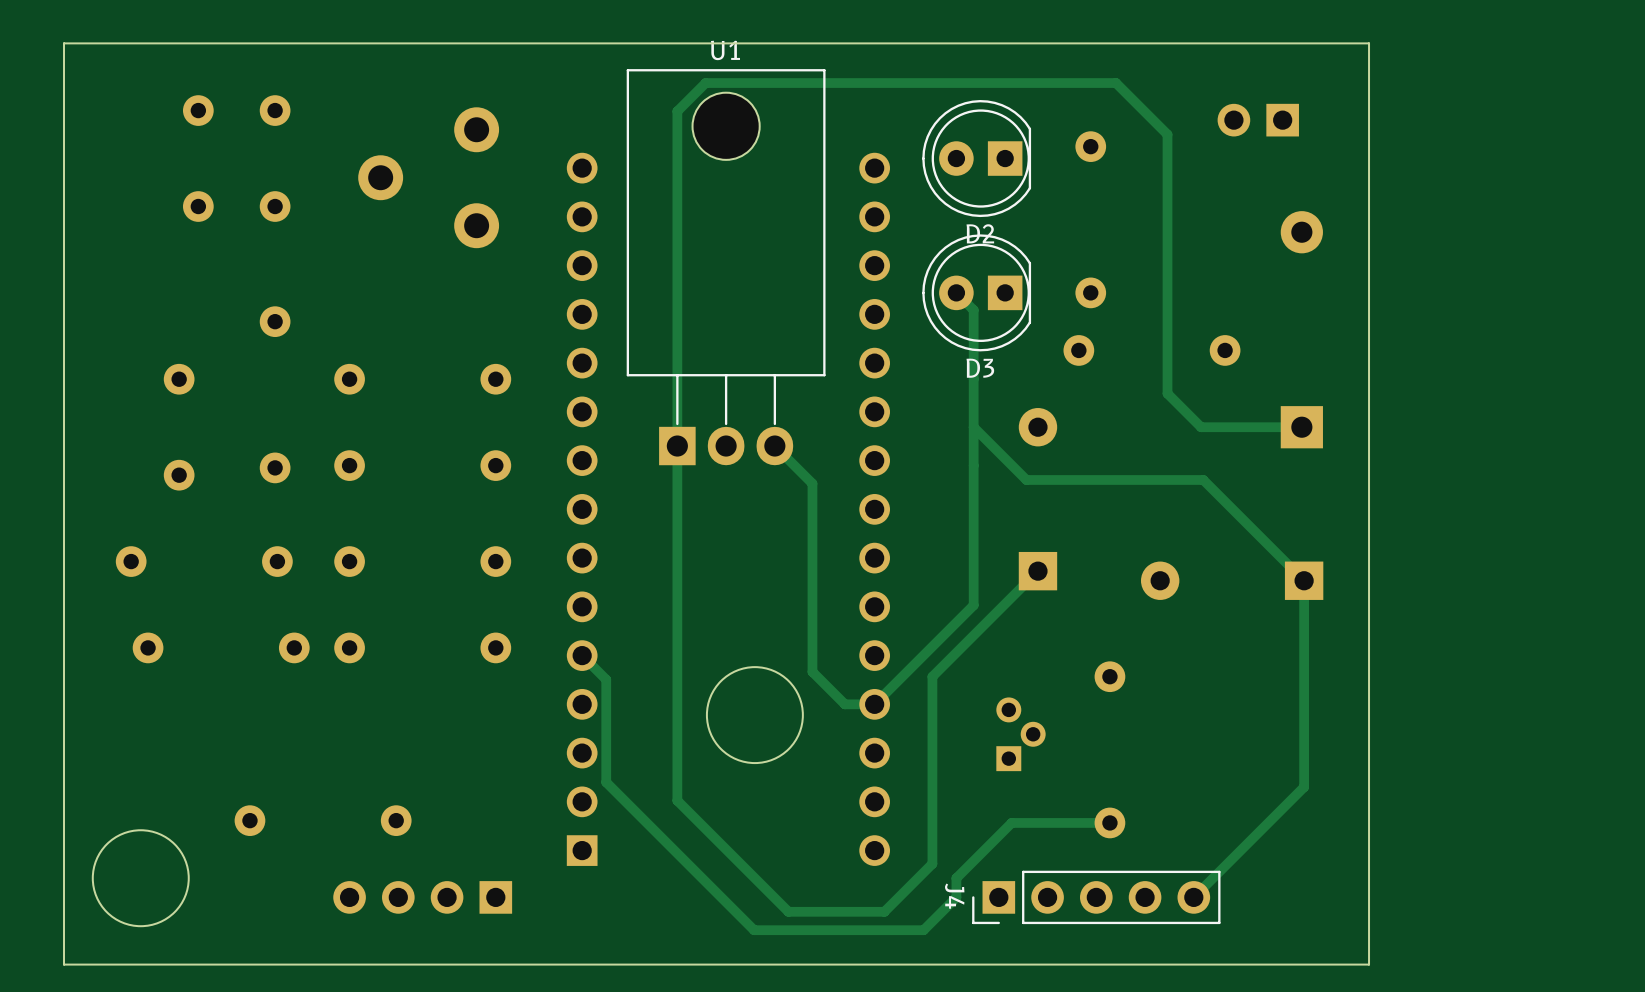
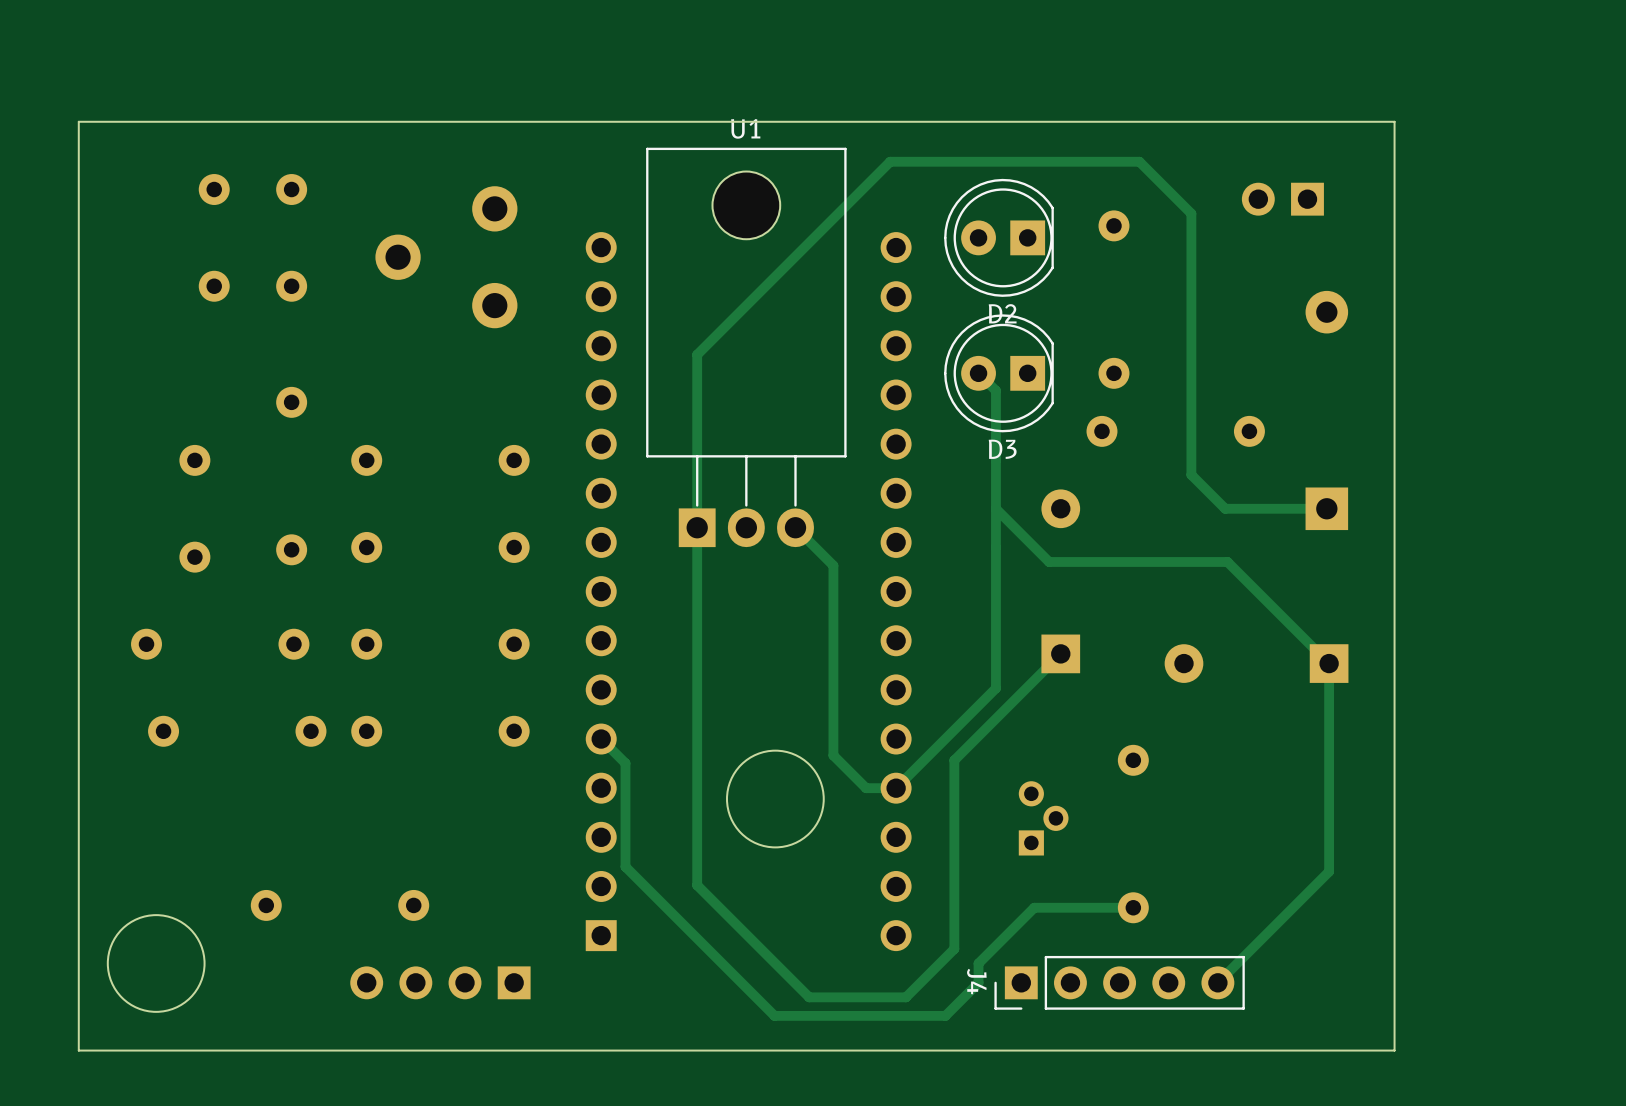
track: (868, 83) (705, 83) (677, 111) (677, 274) -> (890, 161) (697, 354)

